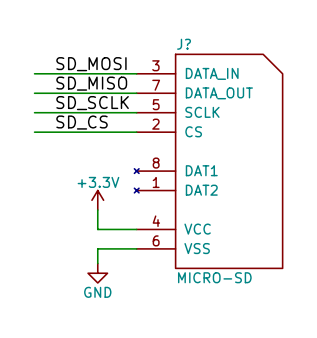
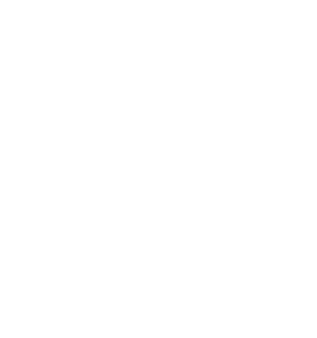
label: SD_MOSI (91, 64) -> none
wire: (34, 73) (136, 73) -> none
label: SD_MISO (91, 83) -> none
wire: (34, 93) (136, 93) -> none
label: SD_SCLK (92, 103) -> none
wire: (34, 112) (136, 112) -> none
label: SD_CS (82, 122) -> none
wire: (34, 132) (136, 132) -> none
J?: MICRO-SD (208, 161) -> none
power symbol: +3.3V (97, 200) -> none
wire: (97, 210) (97, 229) (136, 229) -> none
wire: (136, 248) (97, 248) (97, 263) -> none
power symbol: GND (97, 273) -> none

